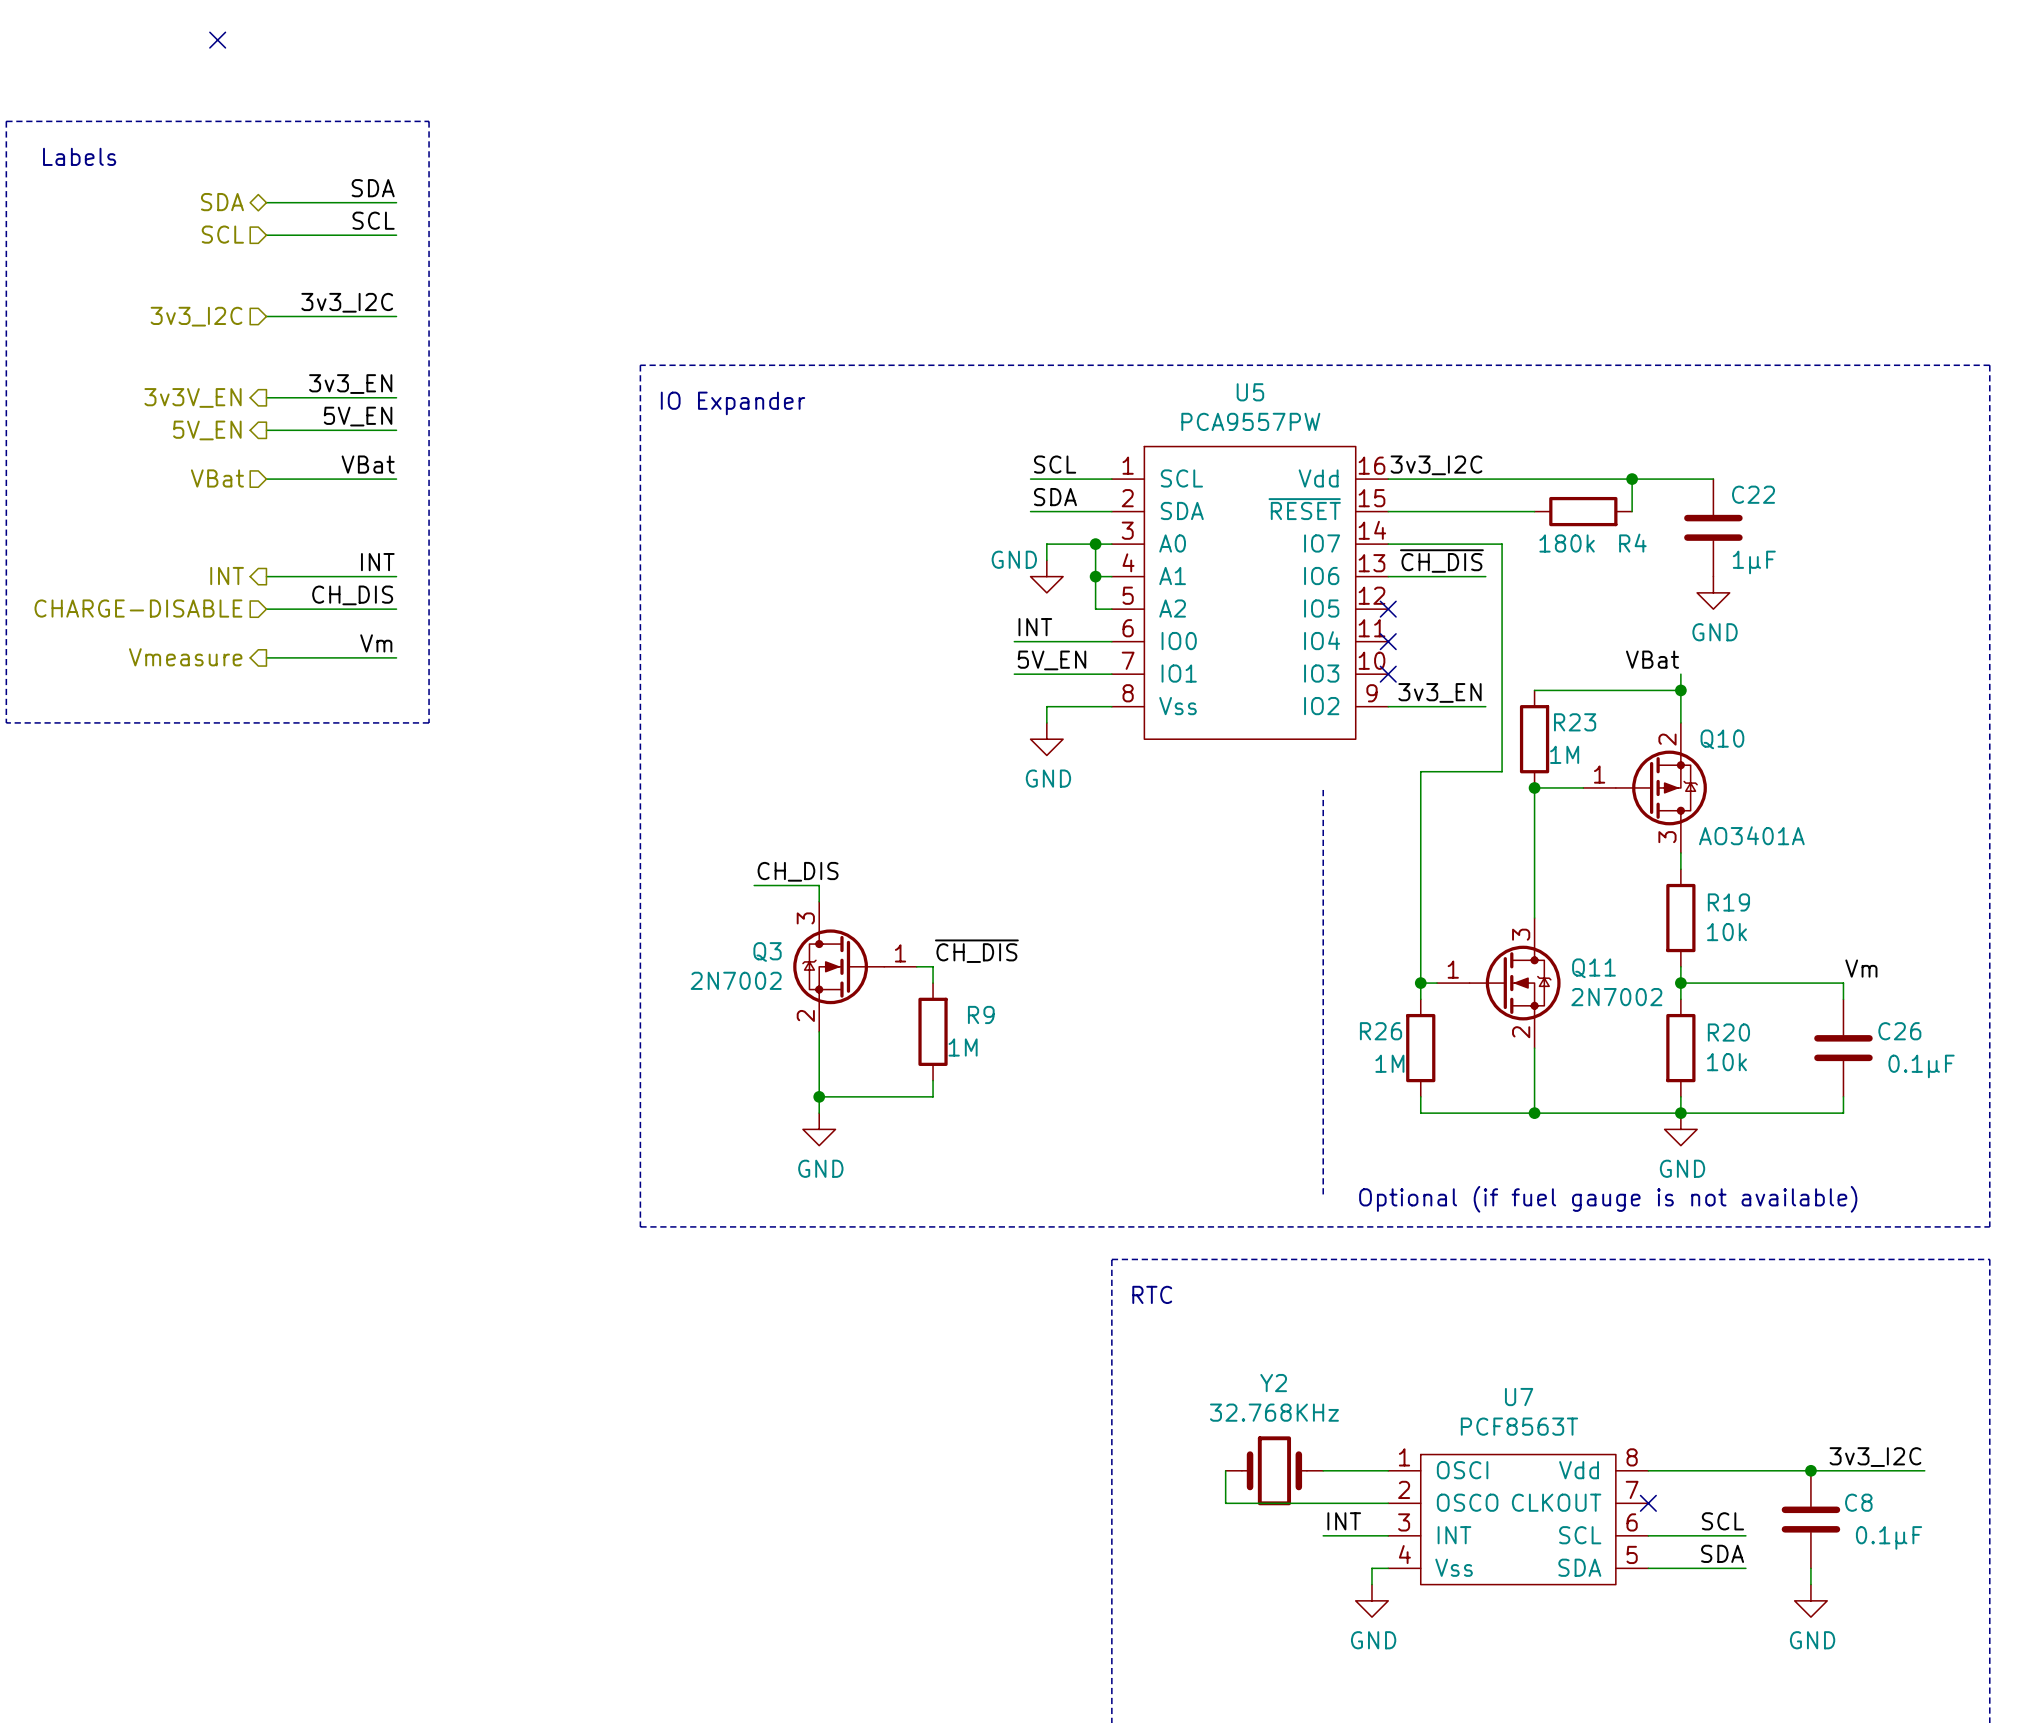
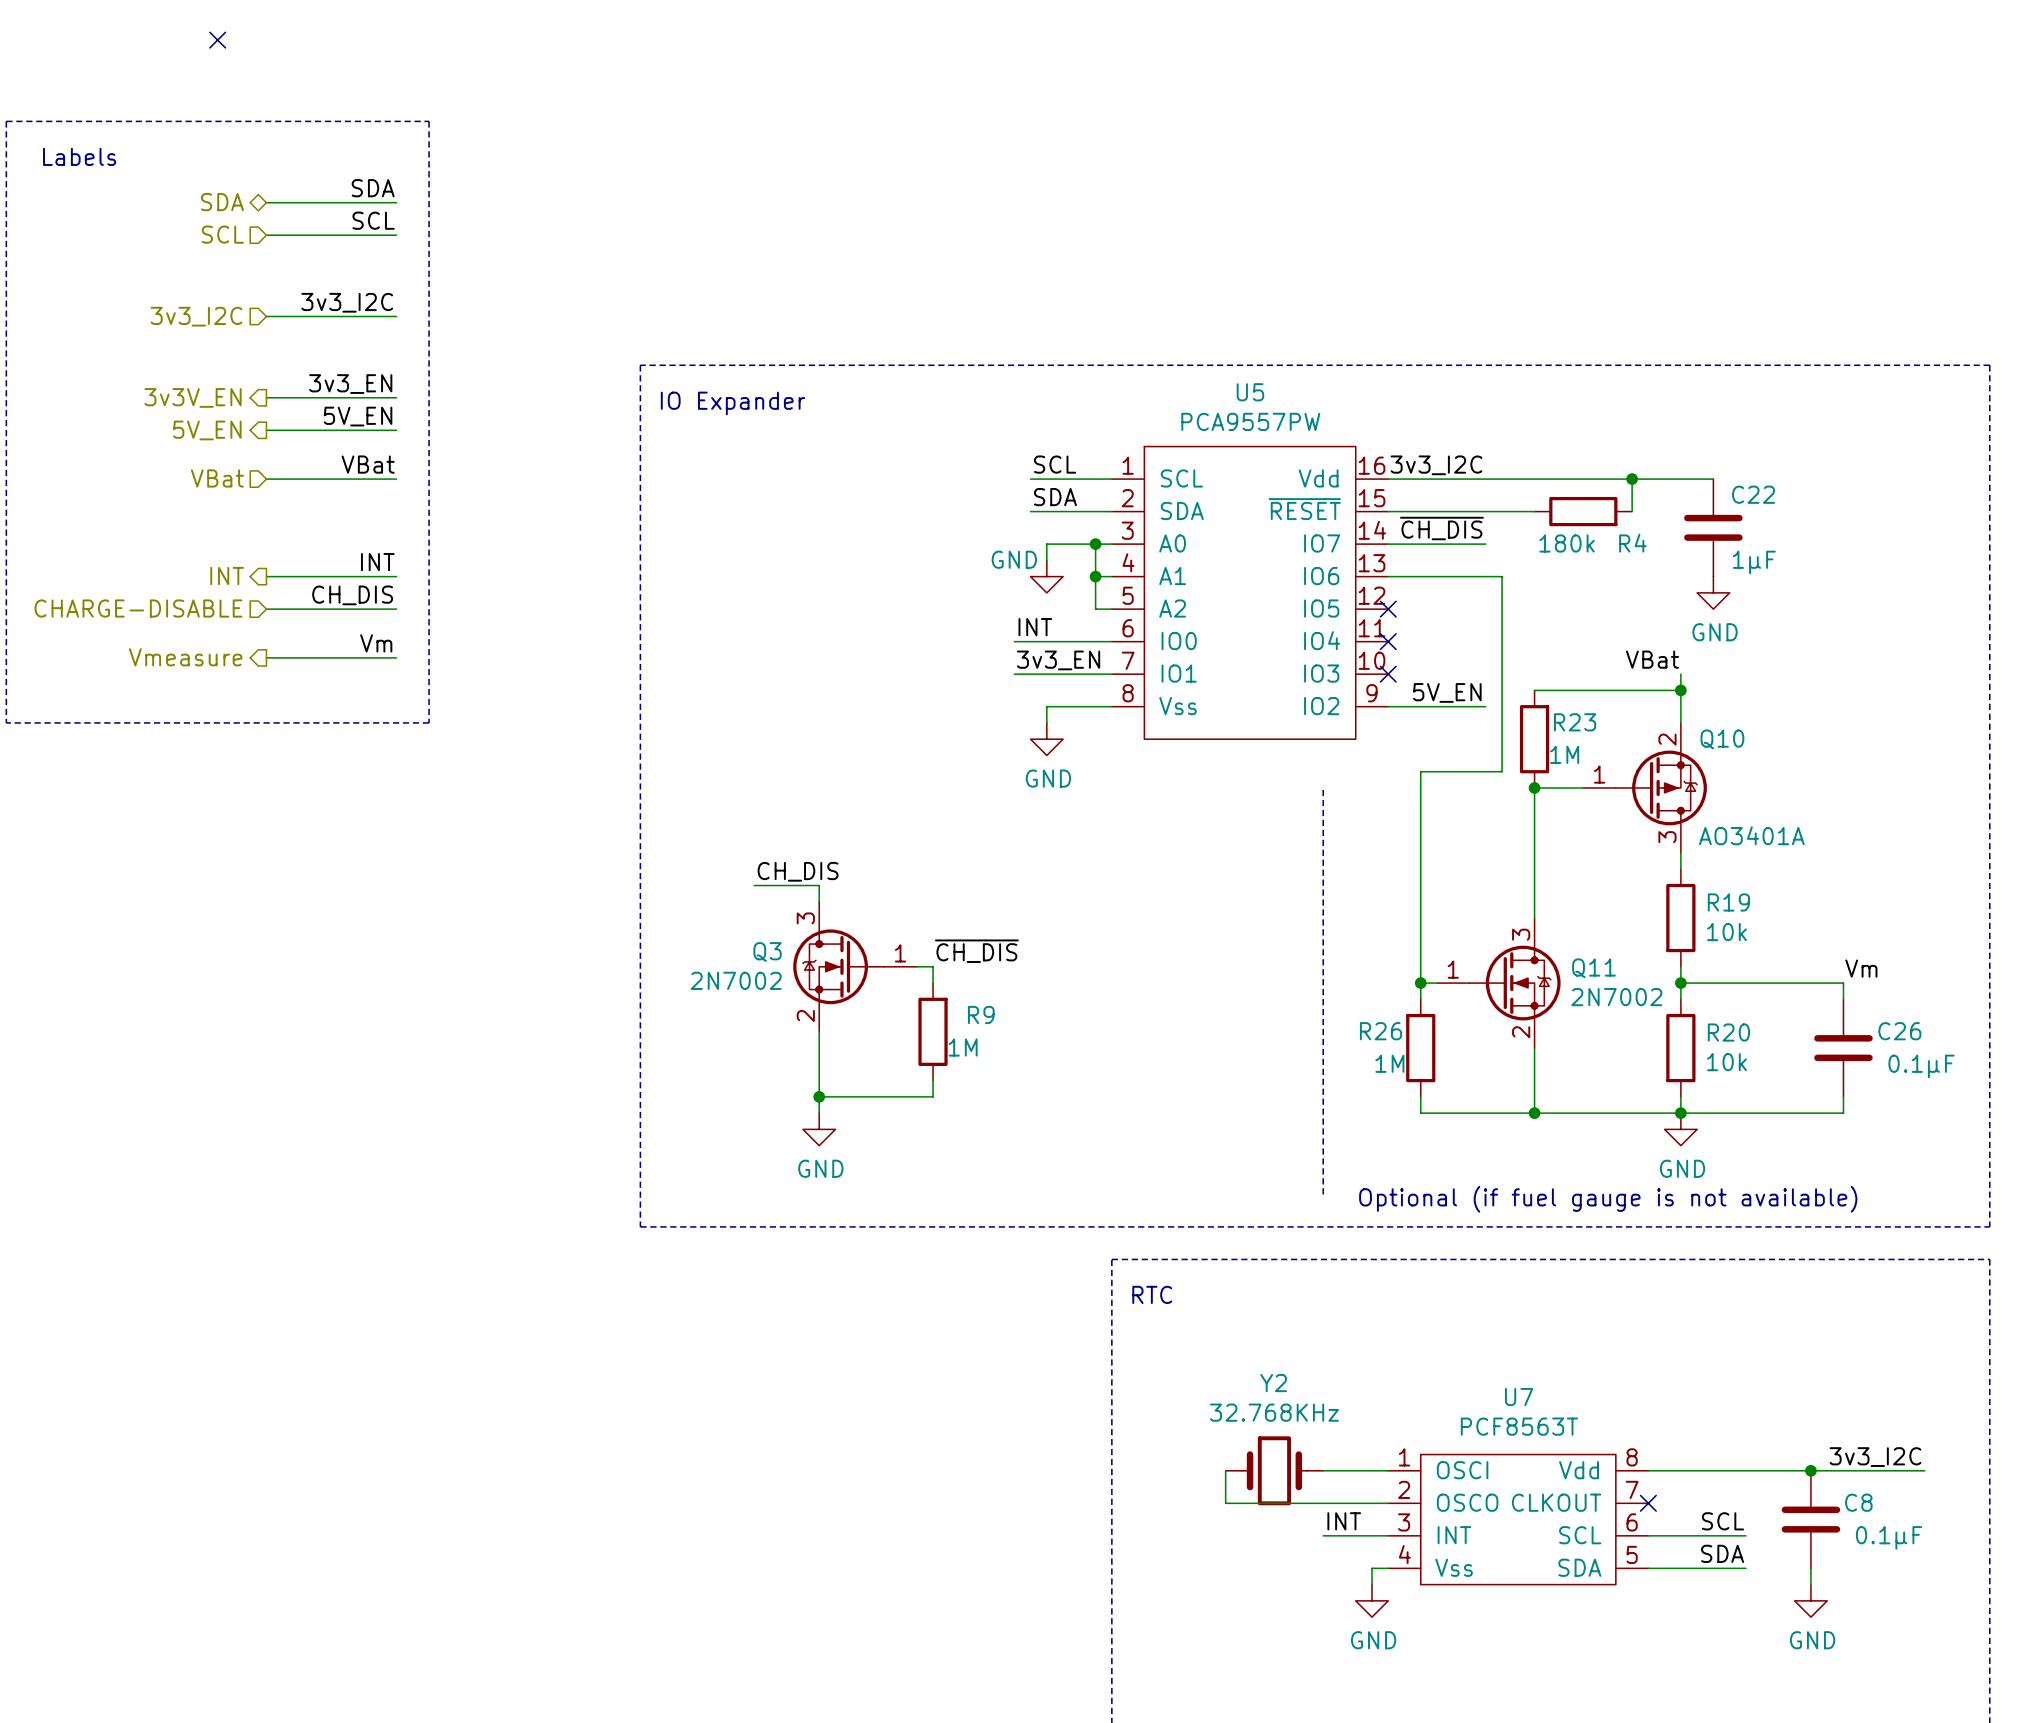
wire: (1485, 544) (1502, 544) (1502, 576) -> (1485, 576) (1502, 576)
label position: ~{CH_DIS} (1441, 561) -> ~{CH_DIS} (1441, 528)
label: 5V_EN (1051, 660) -> 3v3_EN (1058, 660)
label: 3v3_EN (1439, 692) -> 5V_EN (1447, 692)

